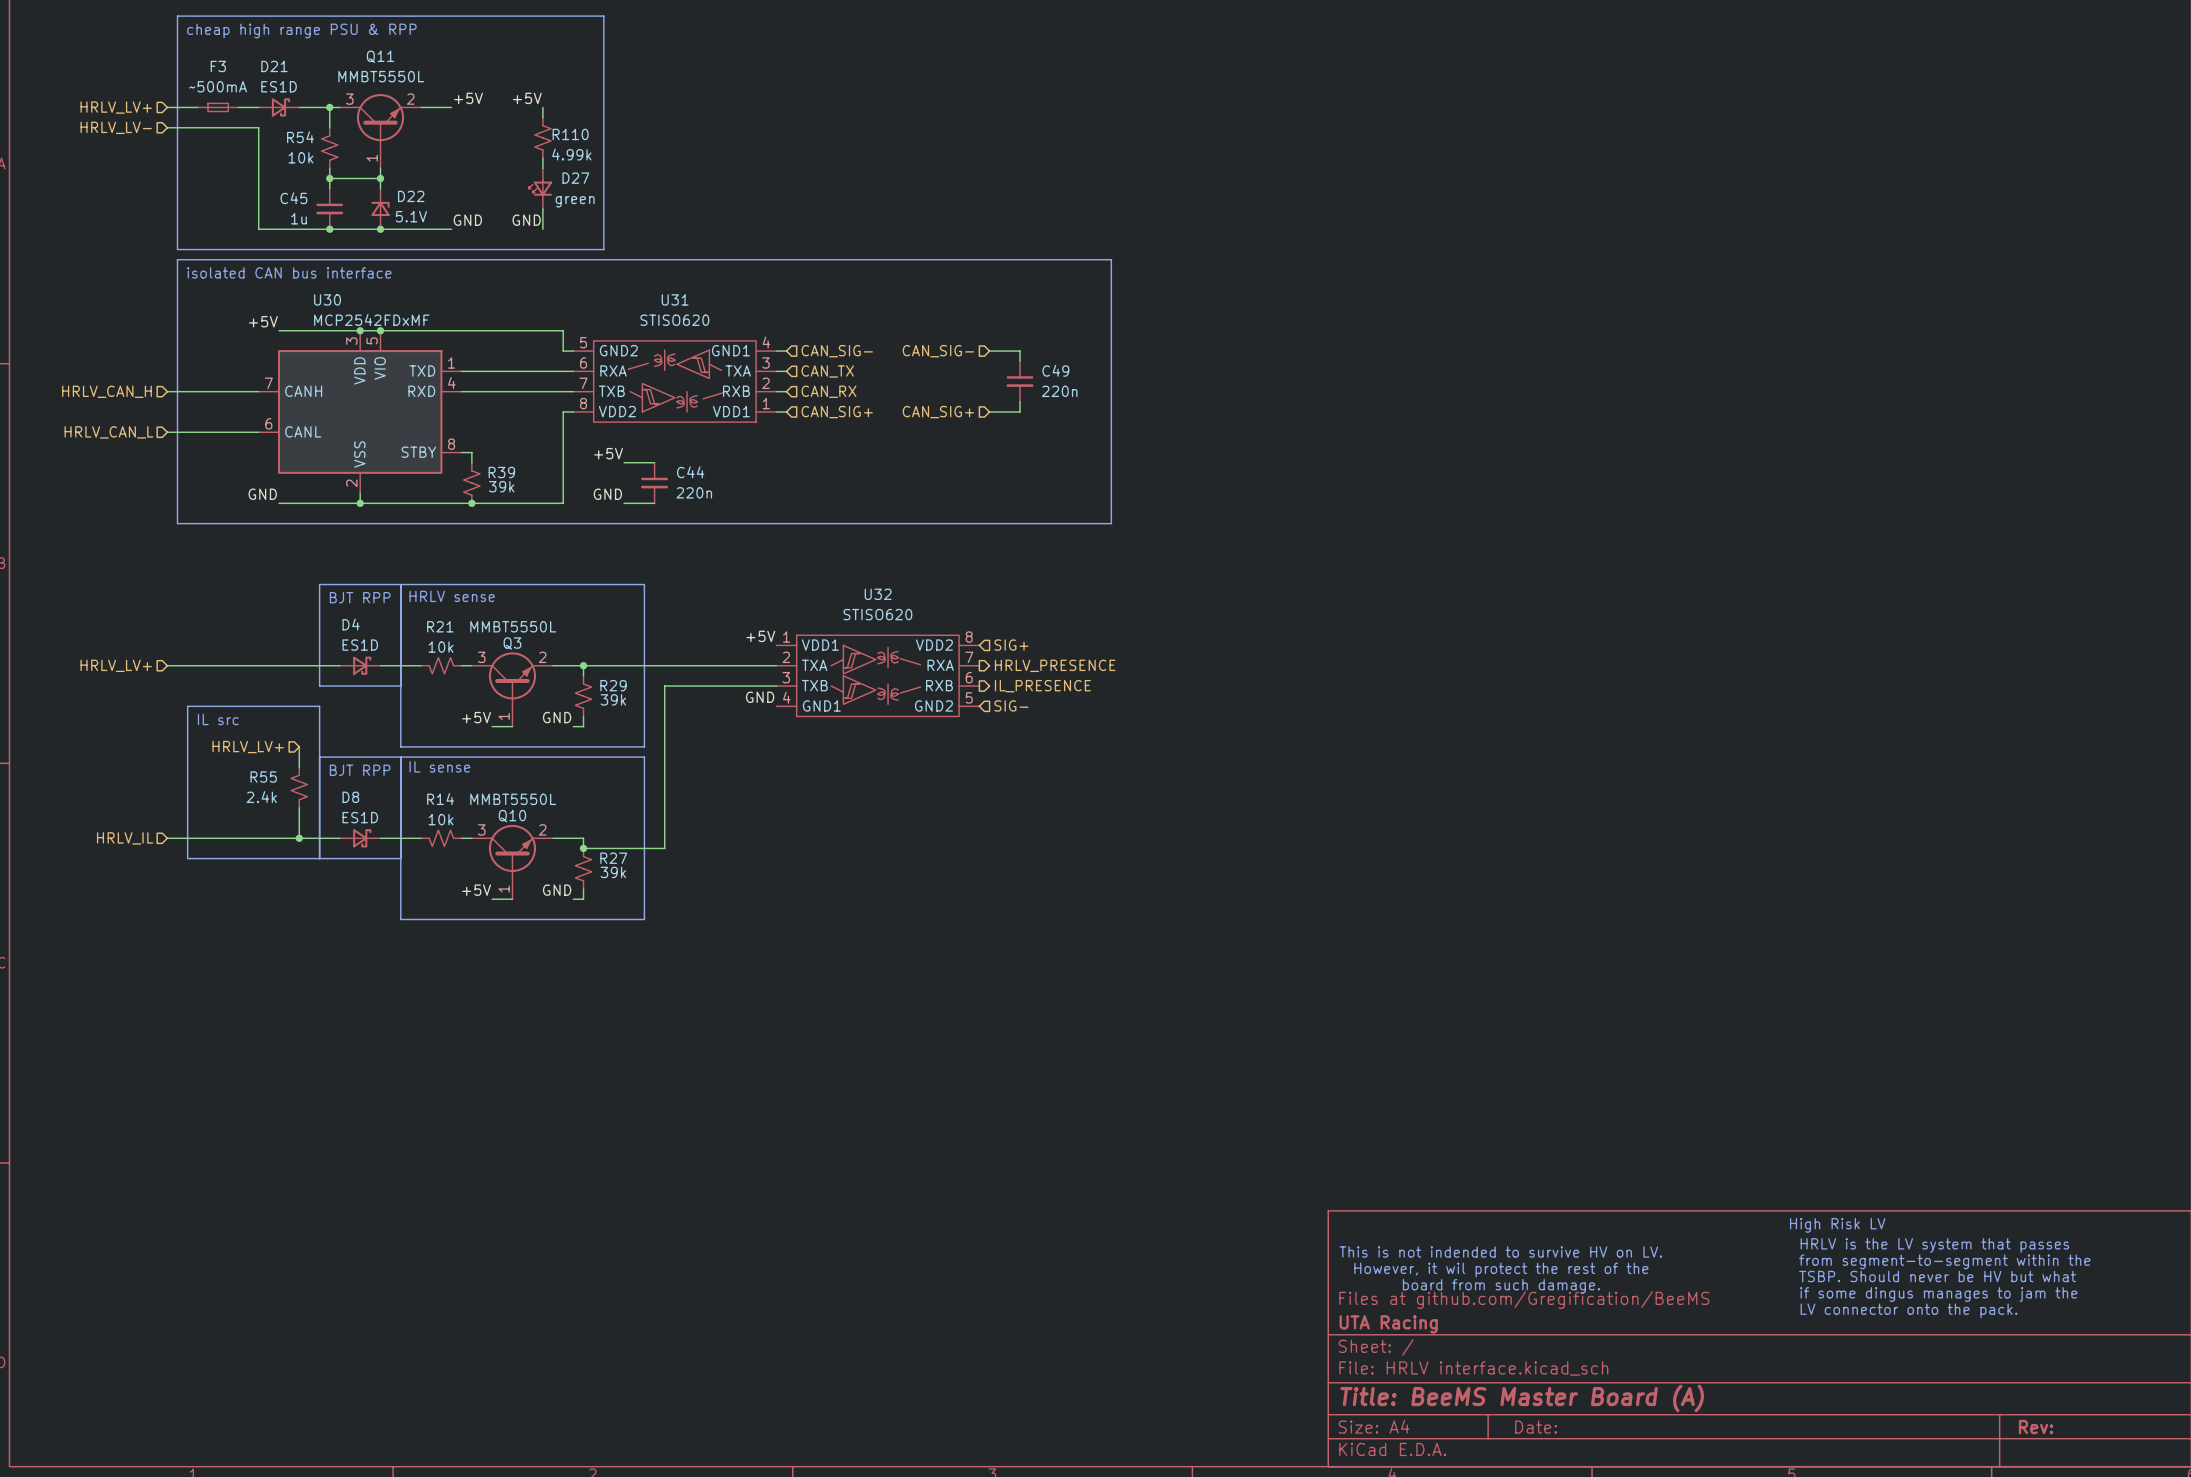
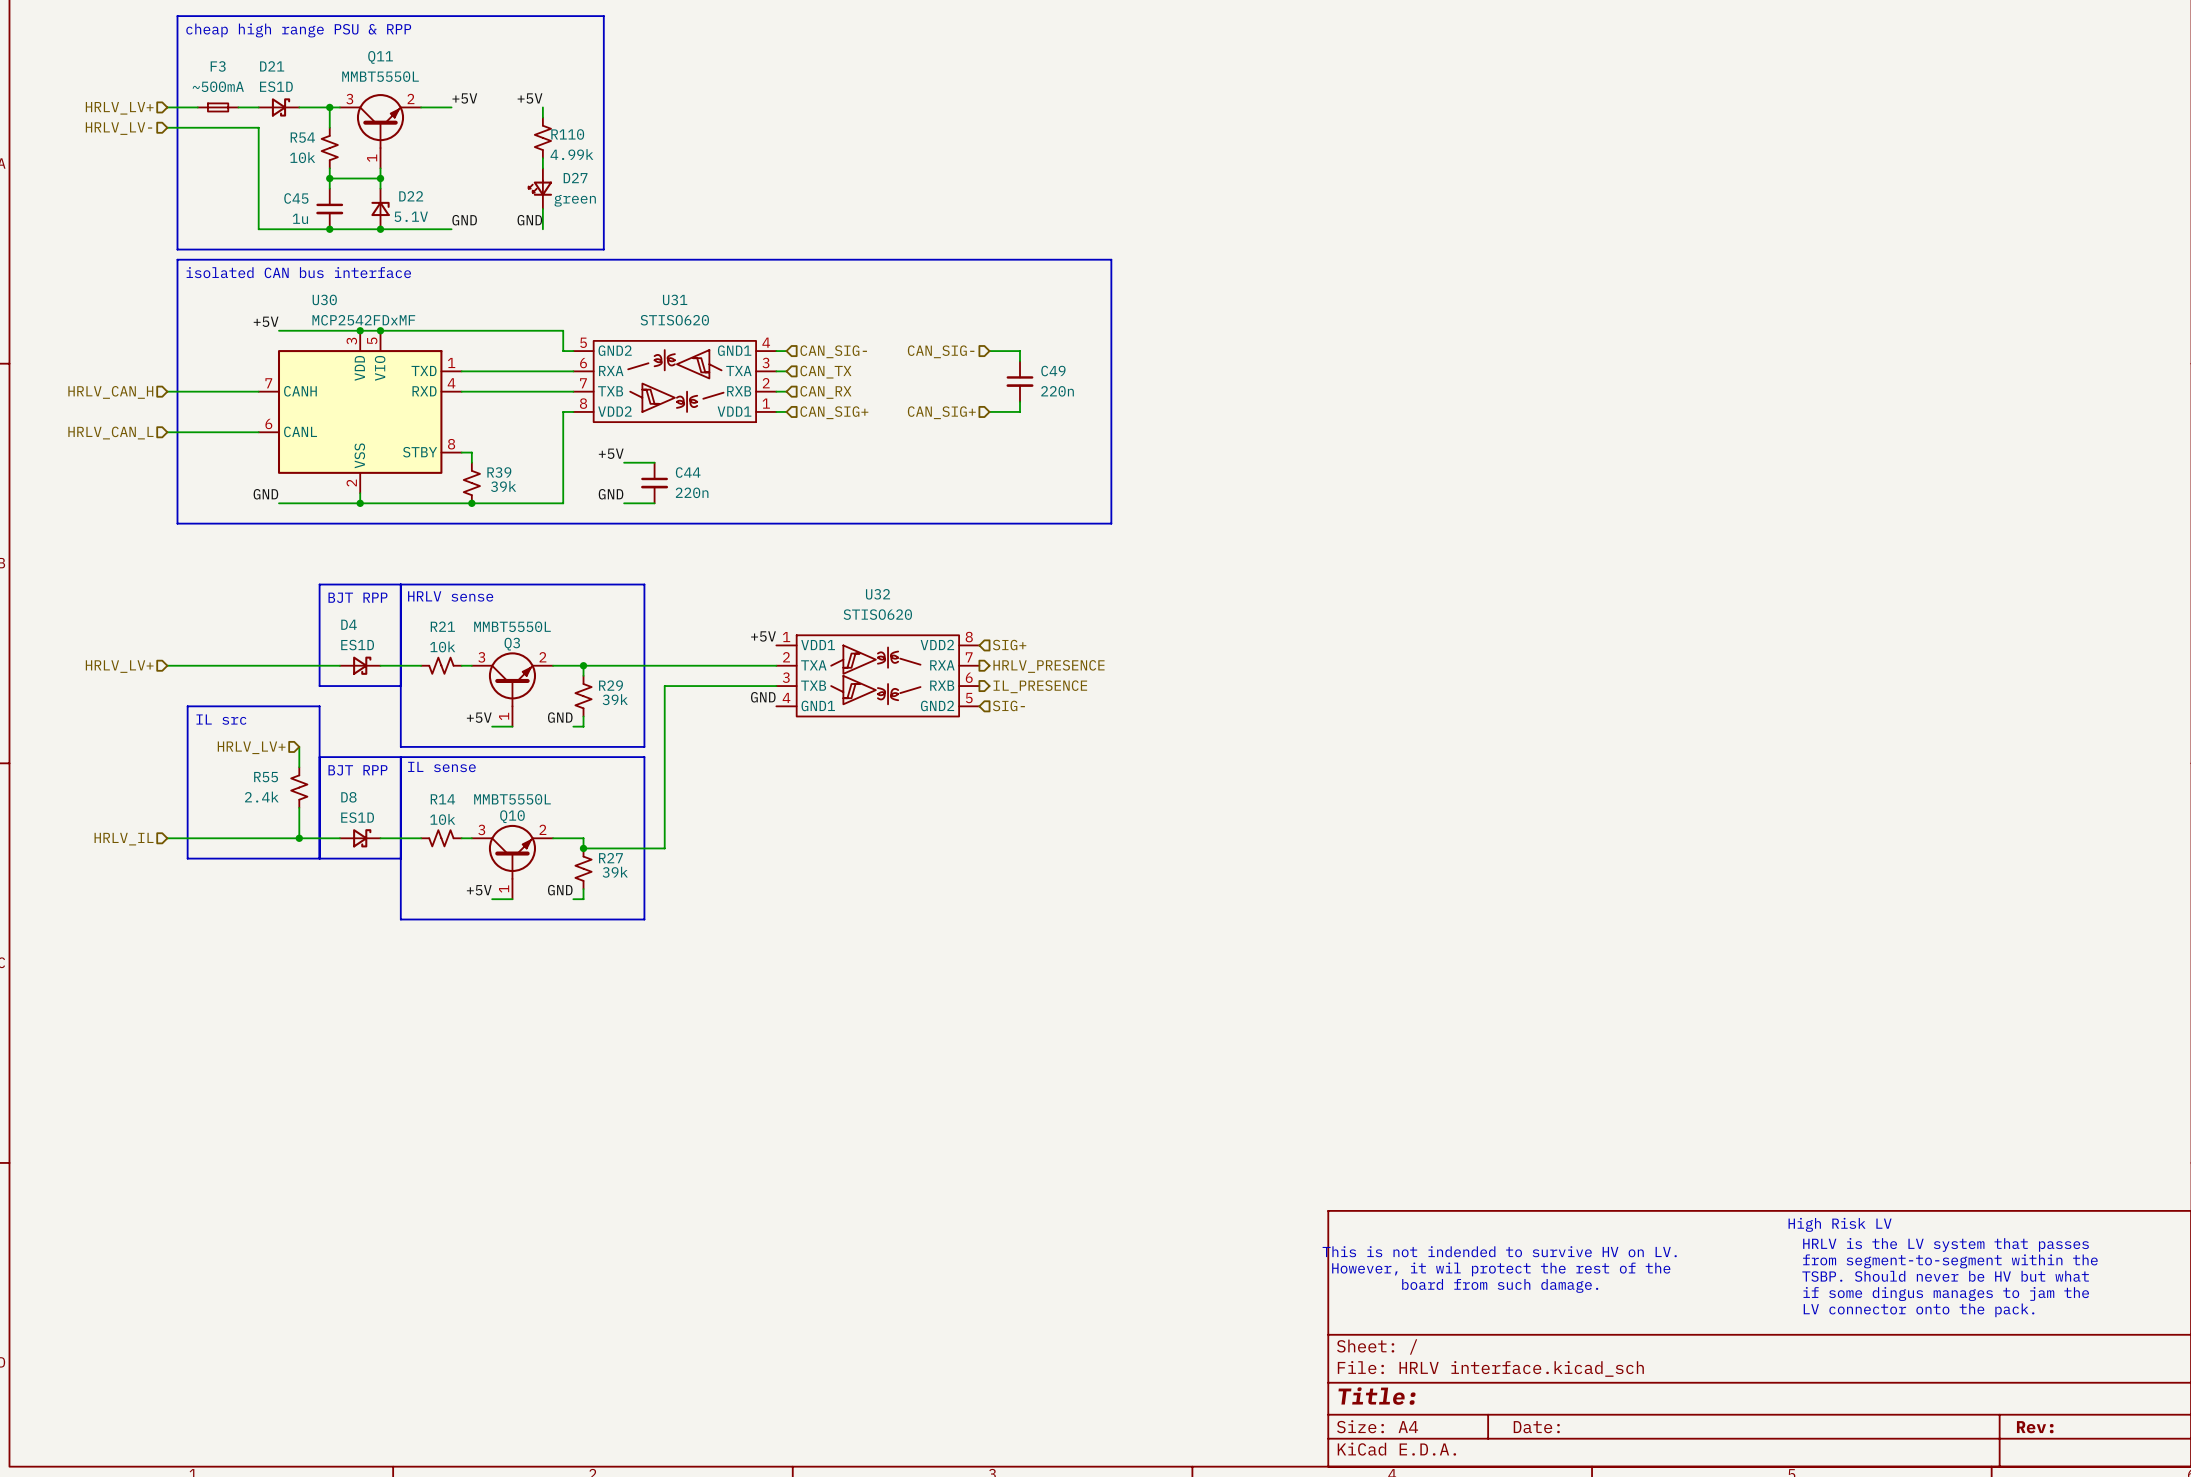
title block: Files at github.com/Gregification/BeeMS (1524, 1300) -> none
title block: UTA Racing (1388, 1324) -> none
title block: Title: BeeMS Master Board (A) (1522, 1398) -> Title: (1377, 1396)

